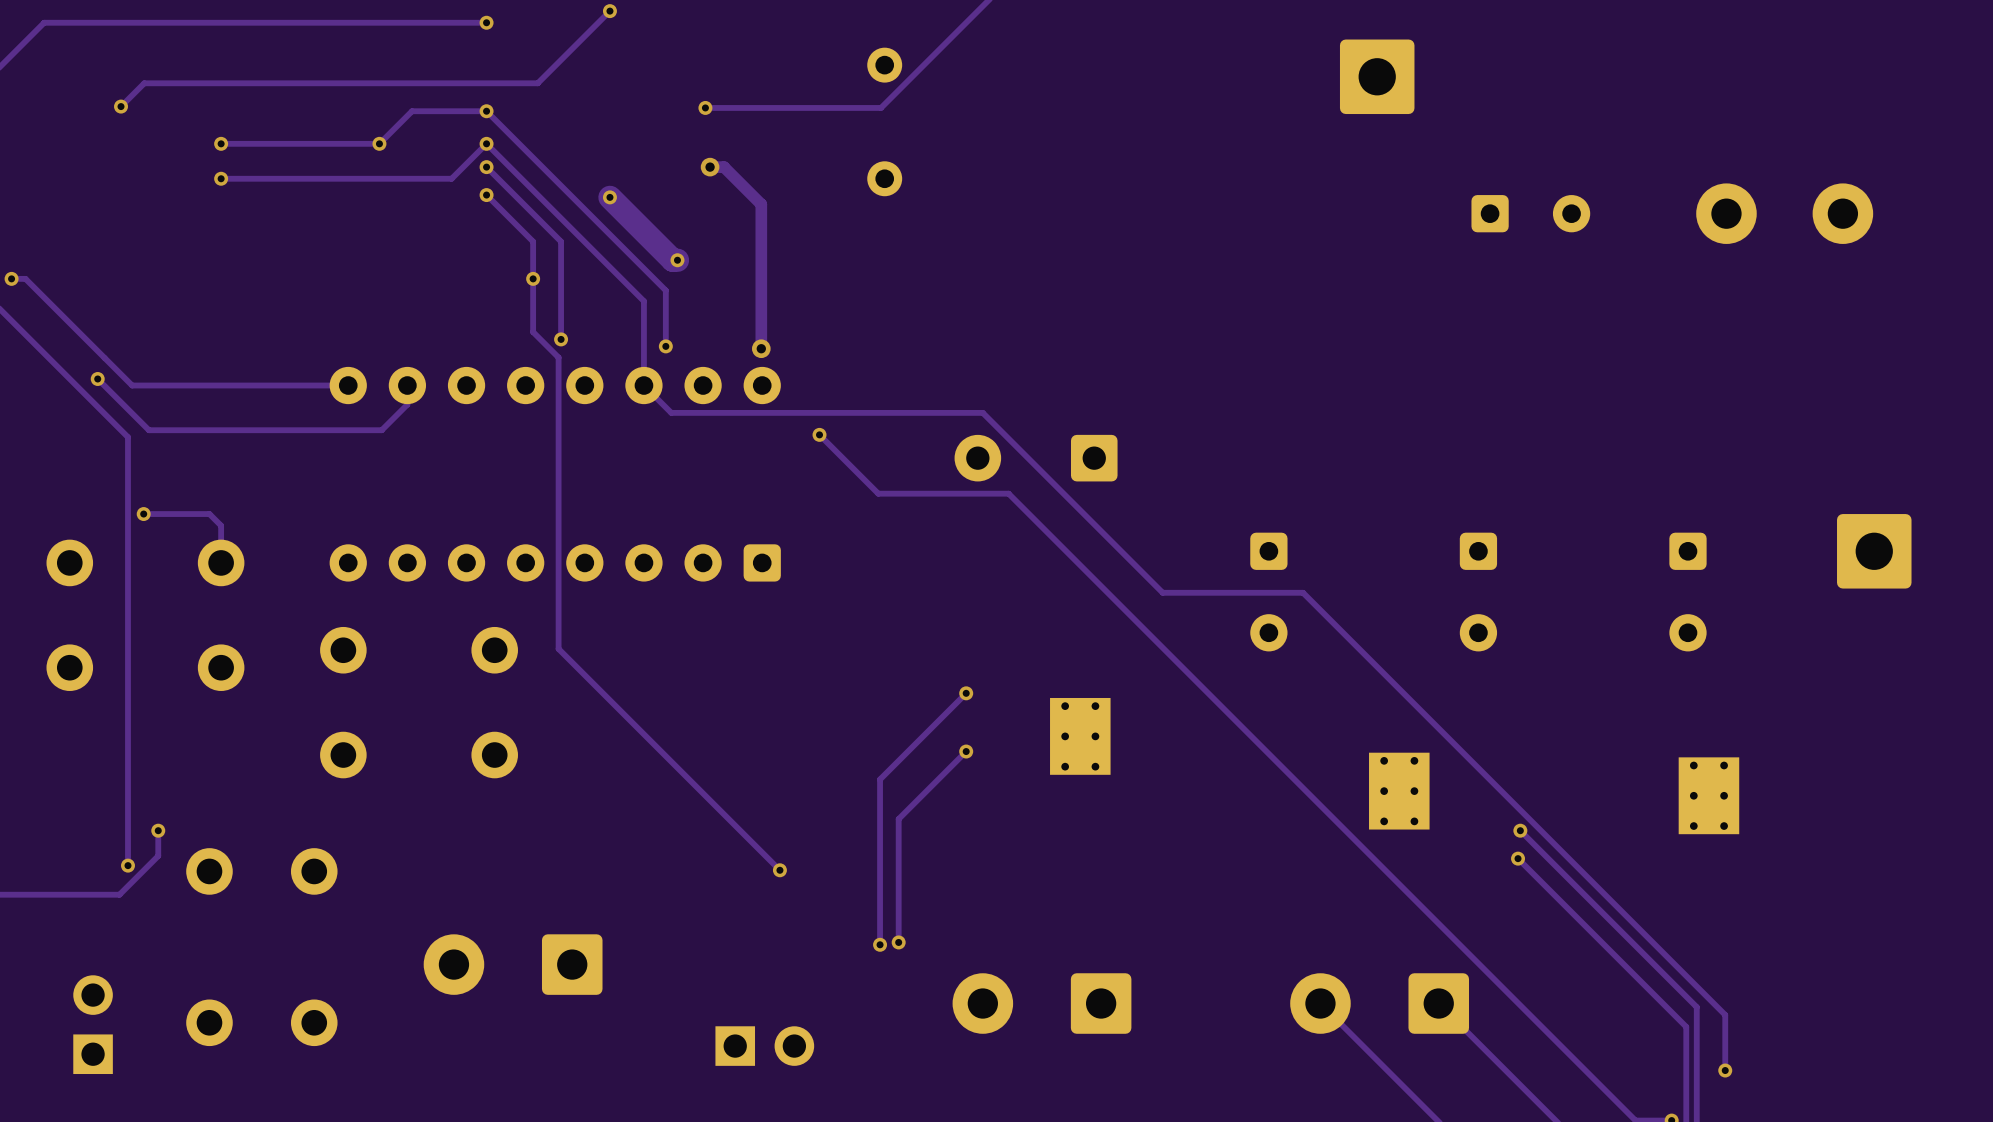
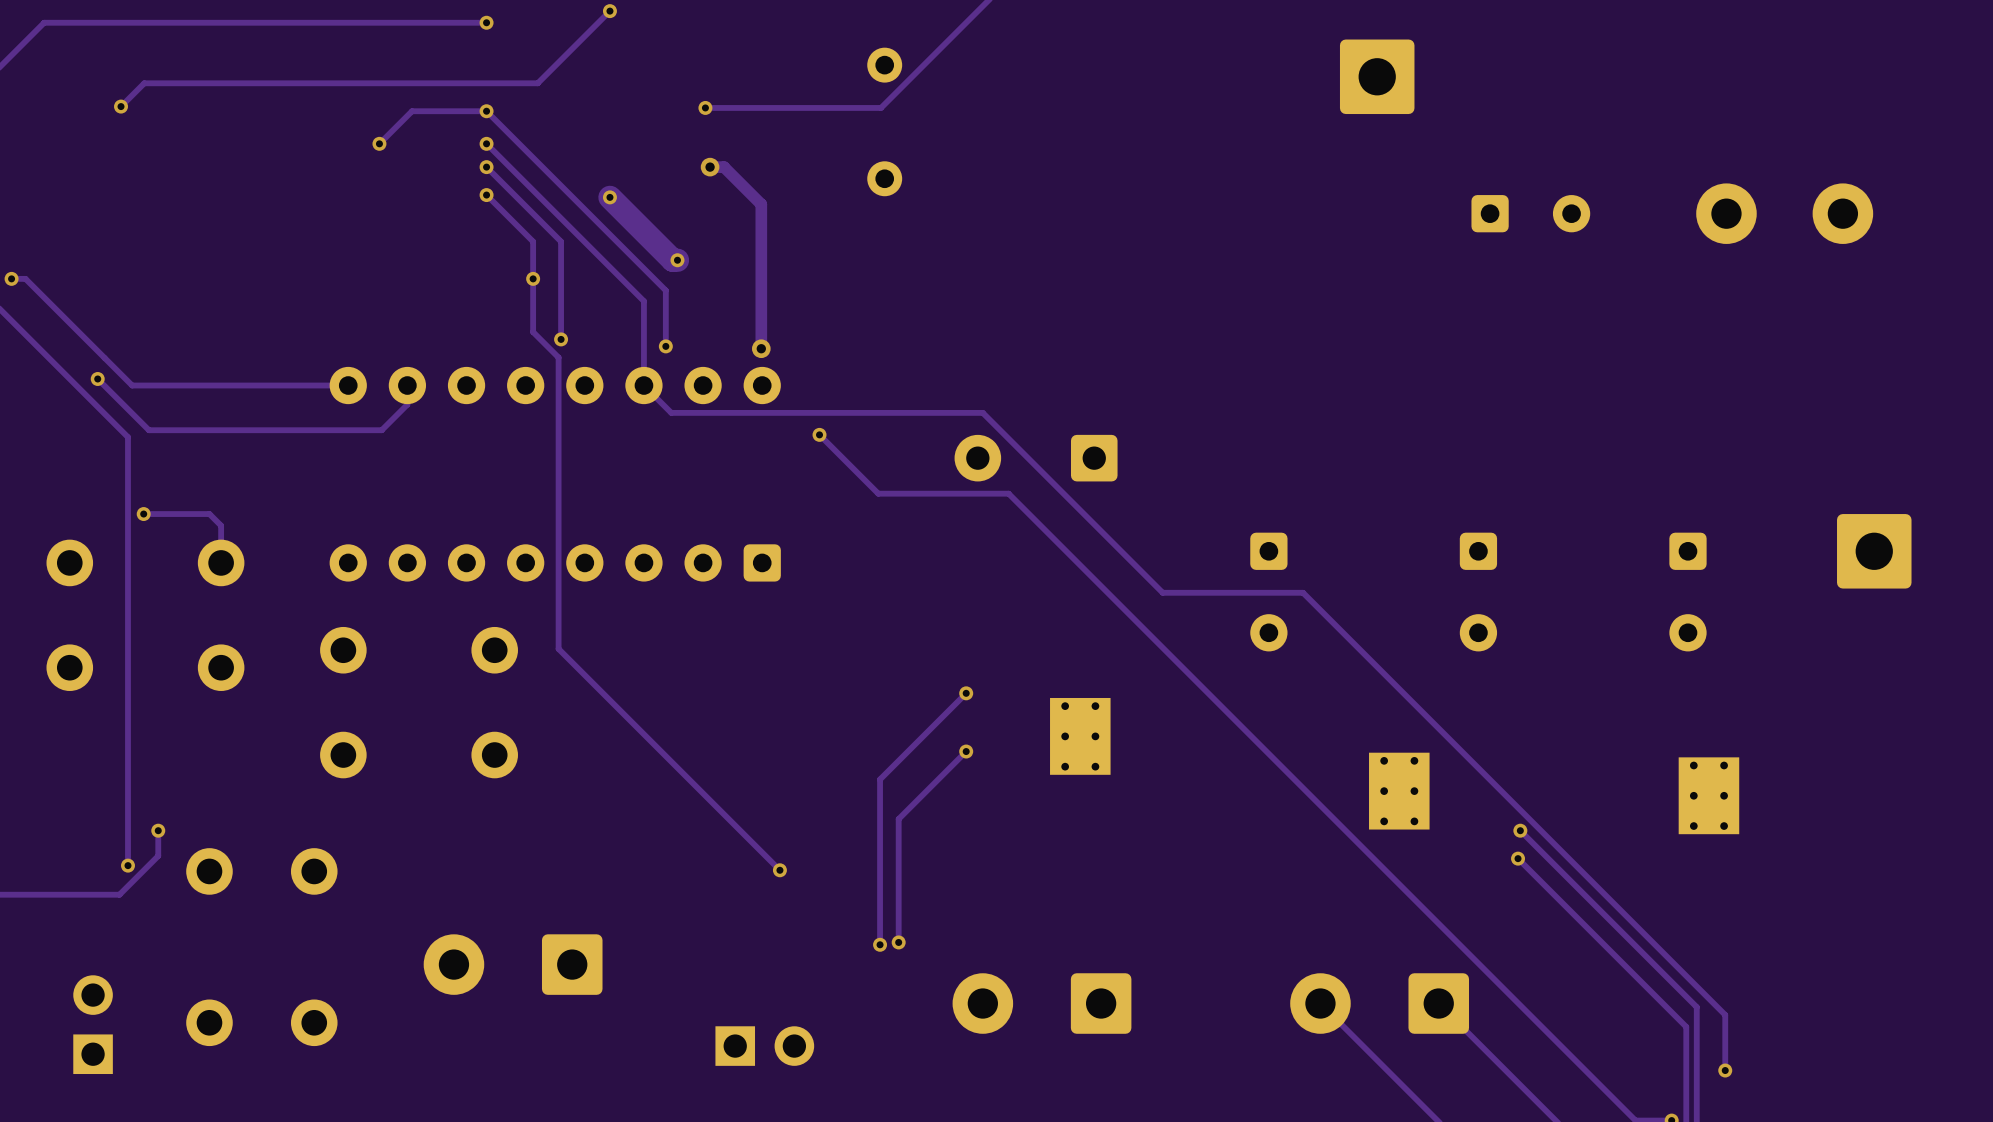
via: (221, 143) -> none
track: (379, 143) (221, 143) -> none
track: (486, 143) (451, 178) (221, 178) -> none
via: (221, 178) -> none

